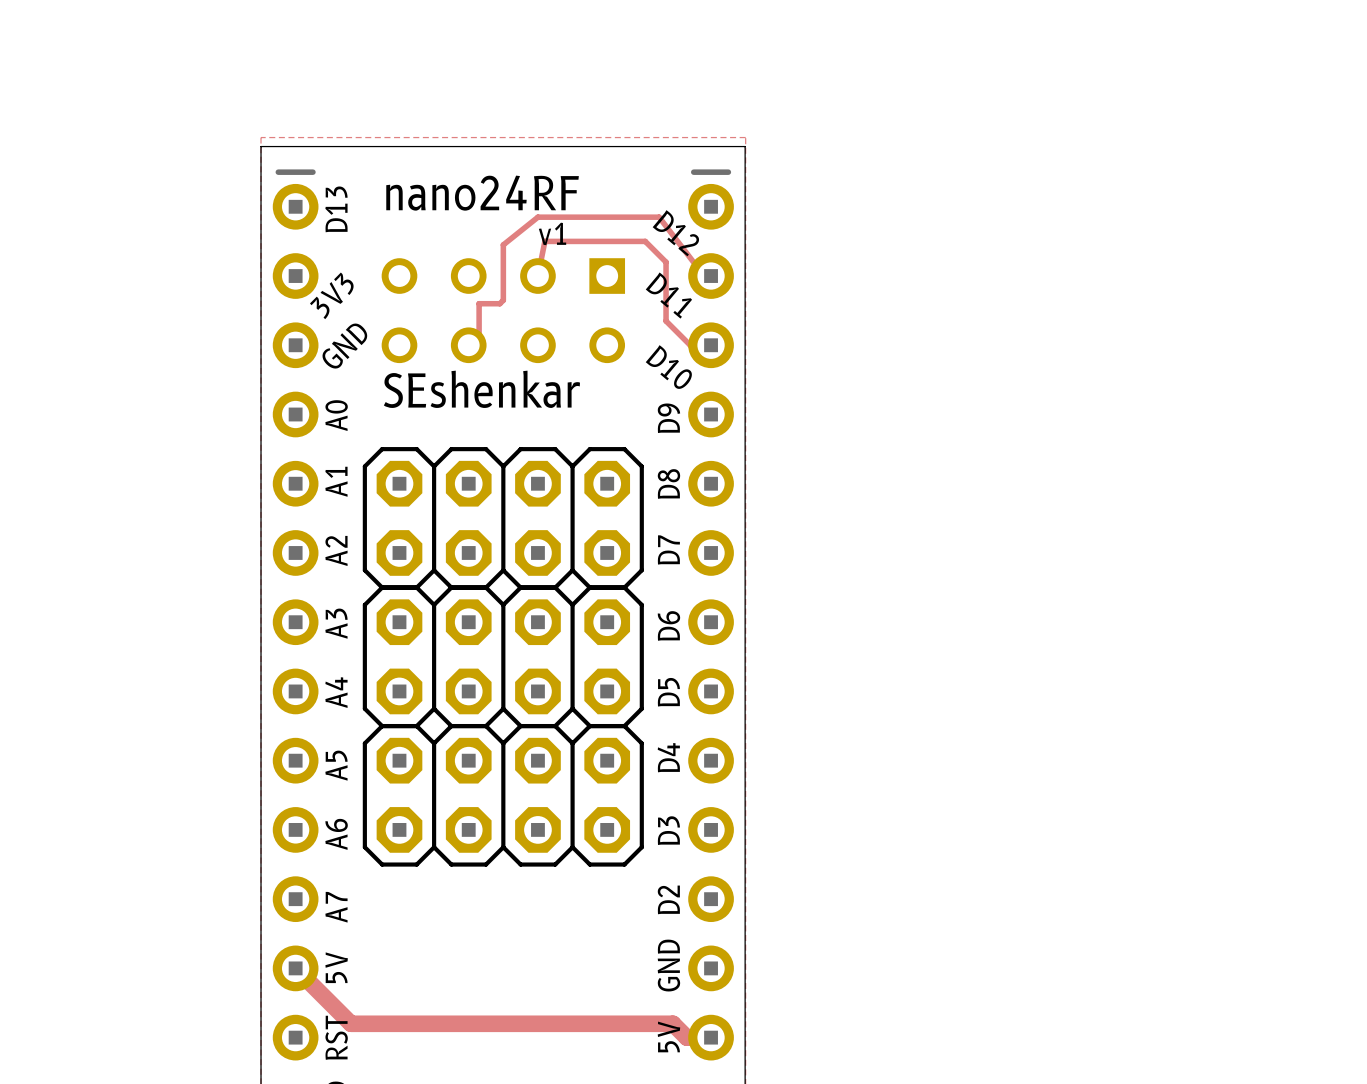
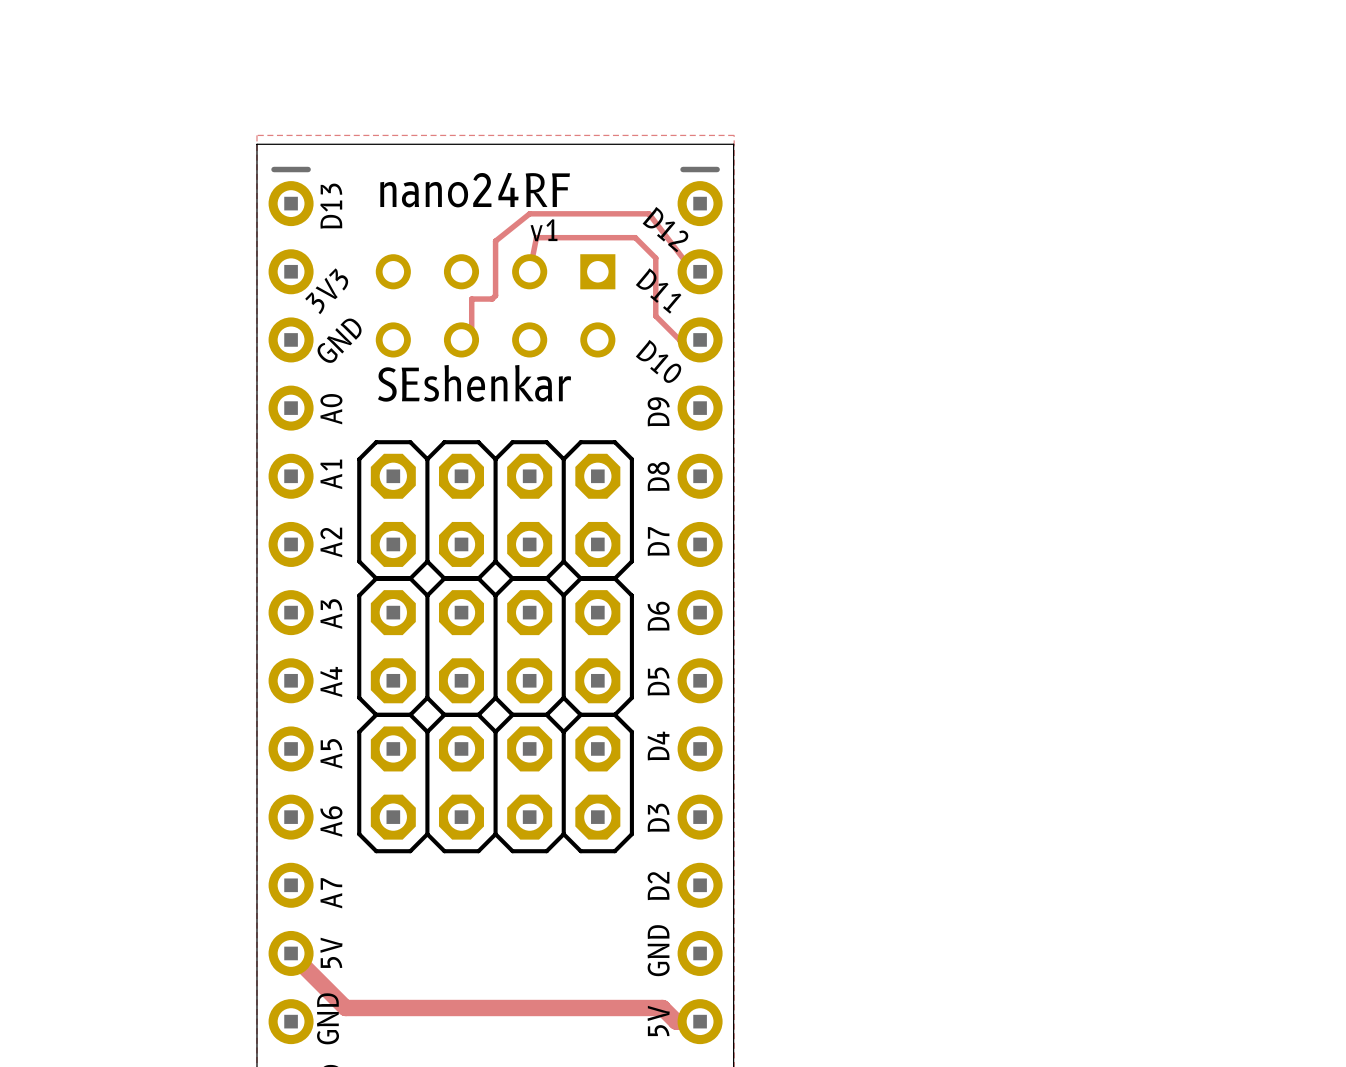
text: RST (336, 1037) -> GND (328, 1018)

